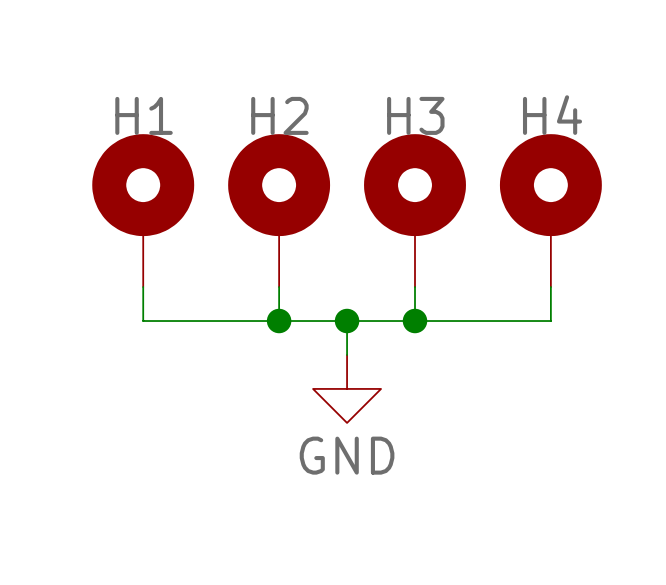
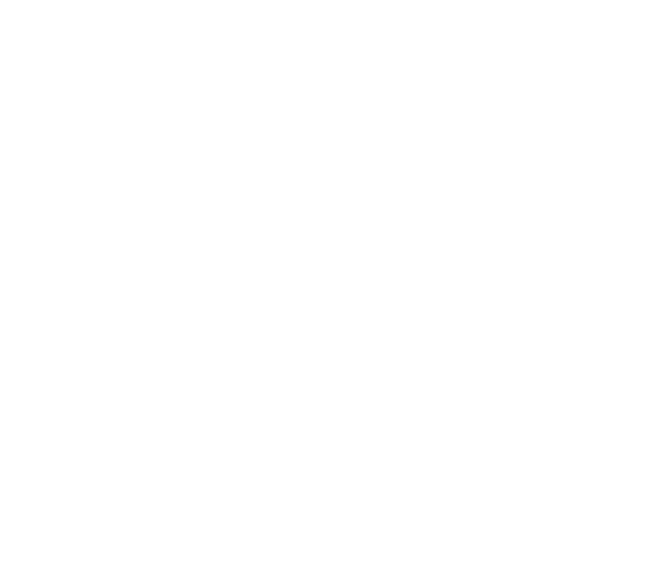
H1: (143, 210) -> none
H2: (279, 210) -> none
H3: (415, 210) -> none
H4: (550, 210) -> none
wire: (143, 287) (143, 321) (550, 321) (550, 287) -> none
wire: (279, 287) (279, 321) -> none
wire: (415, 287) (415, 321) -> none
junction: (279, 321) -> none
wire: (347, 321) (347, 354) -> none
junction: (347, 321) -> none
junction: (415, 321) -> none
power symbol: GND (347, 388) -> none

